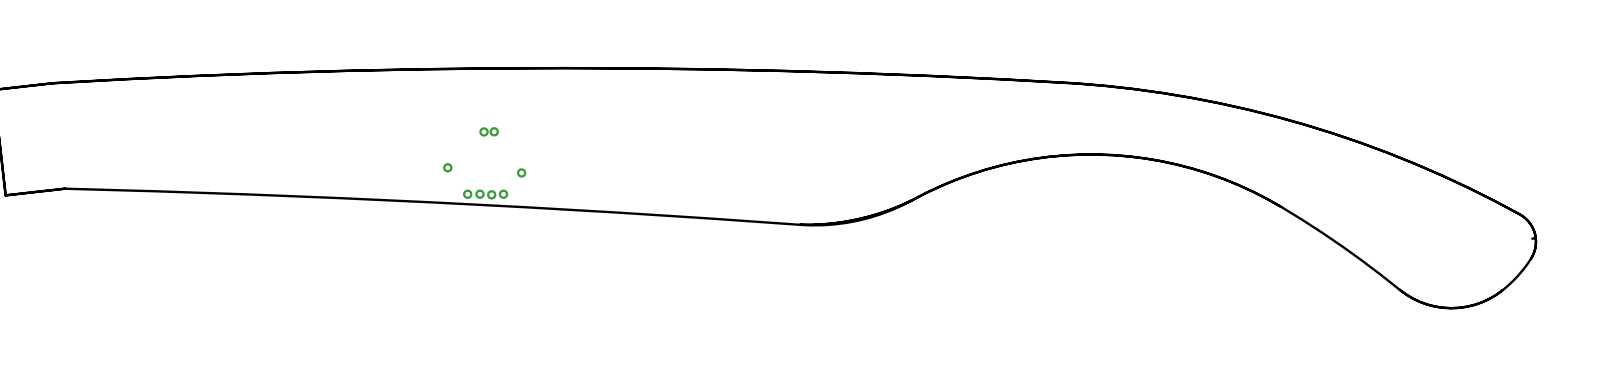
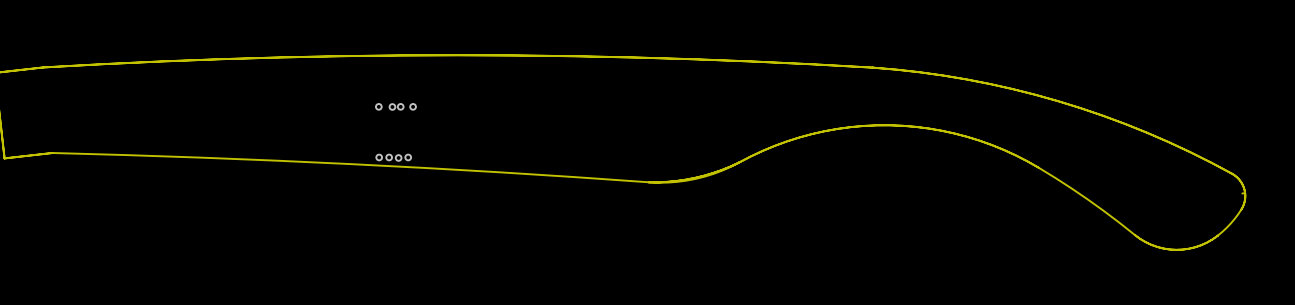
via: none -> (378, 106)
via: none -> (413, 106)
via: (447, 167) -> none
via: (521, 172) -> none

